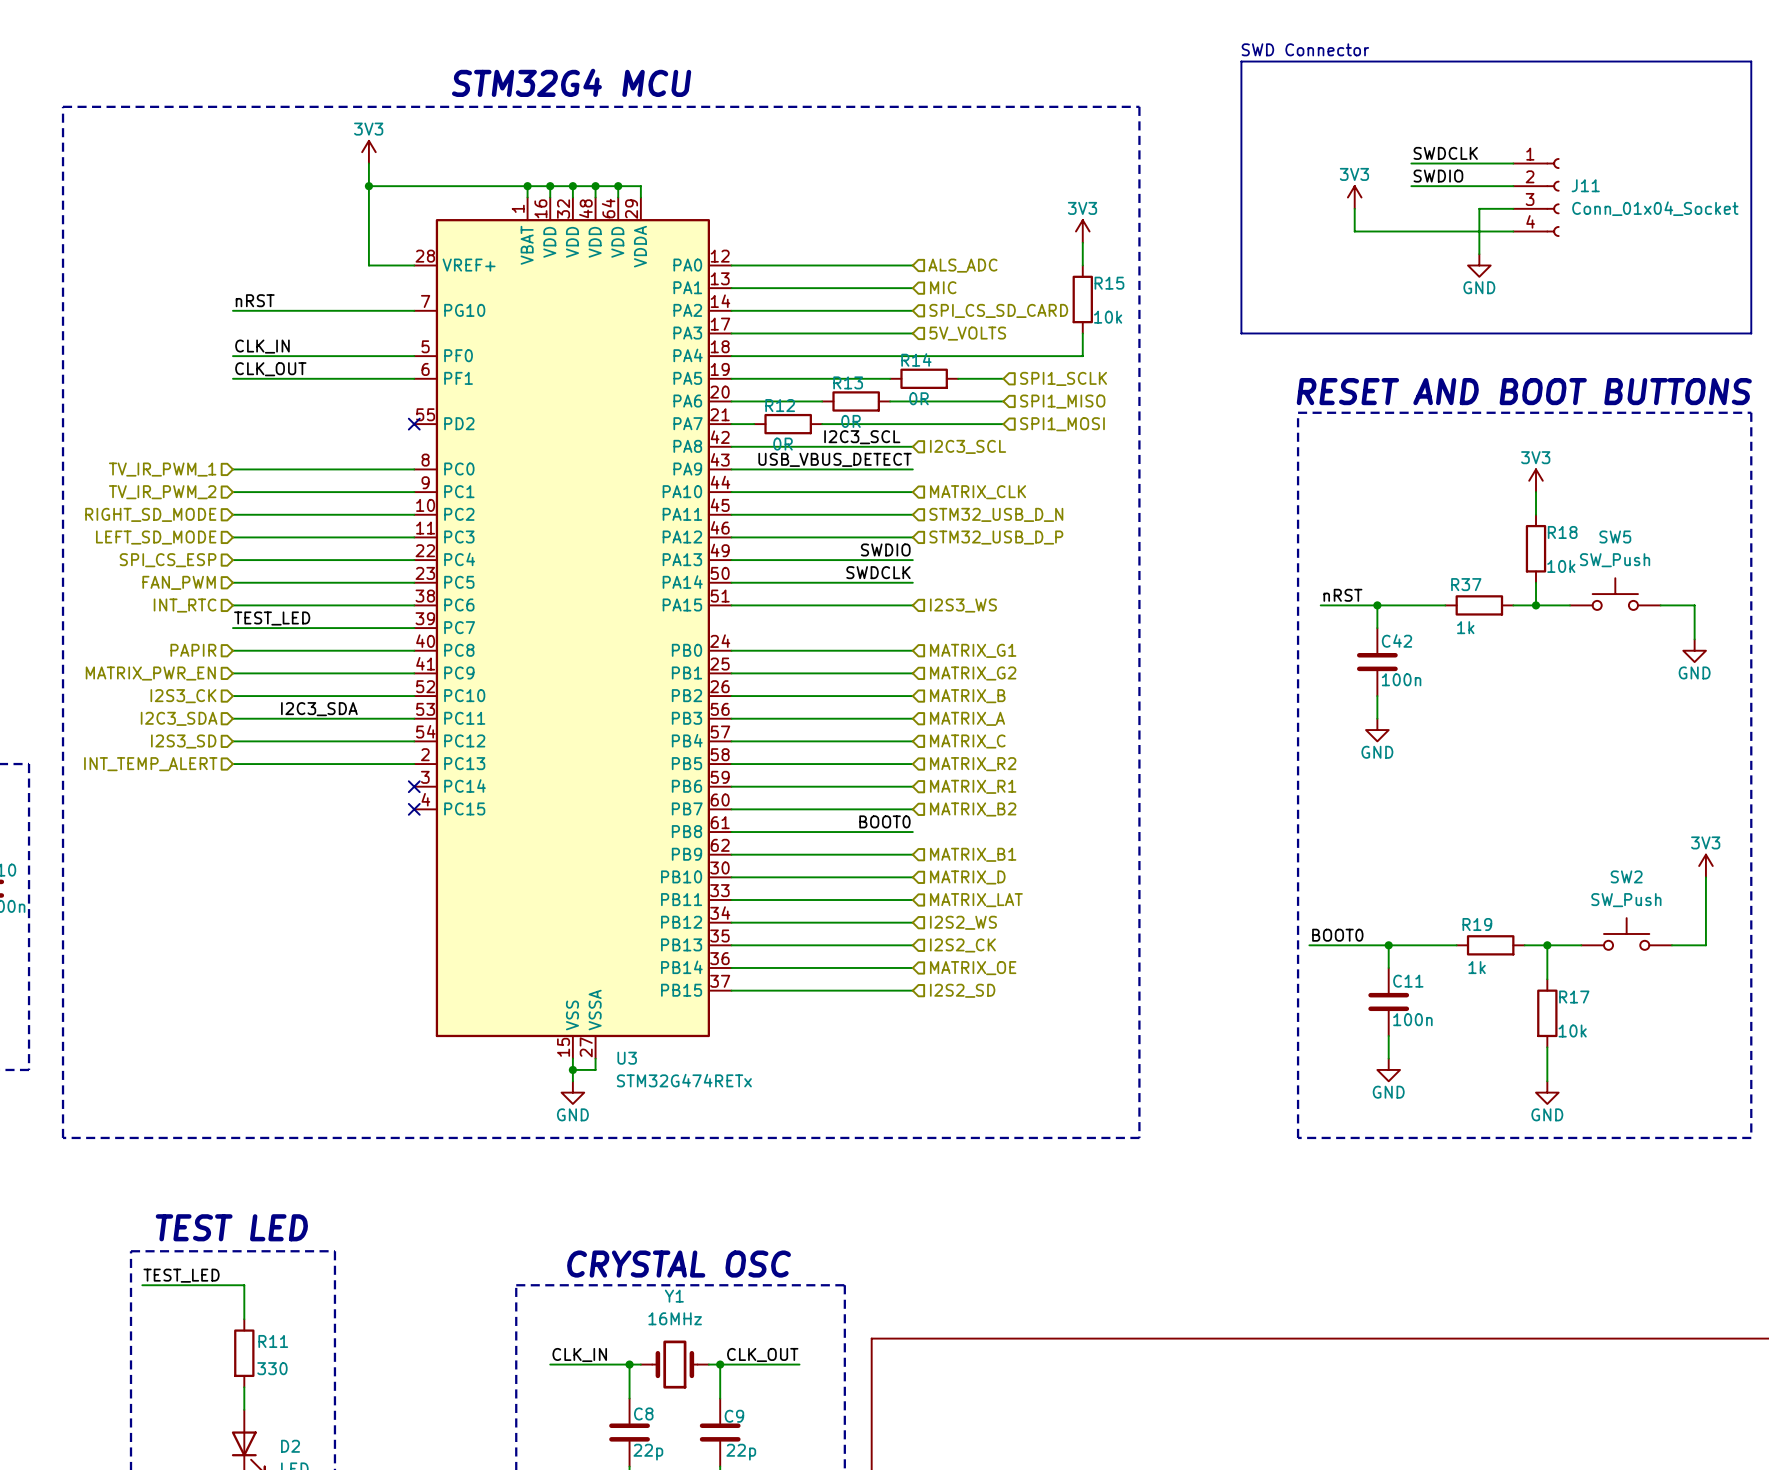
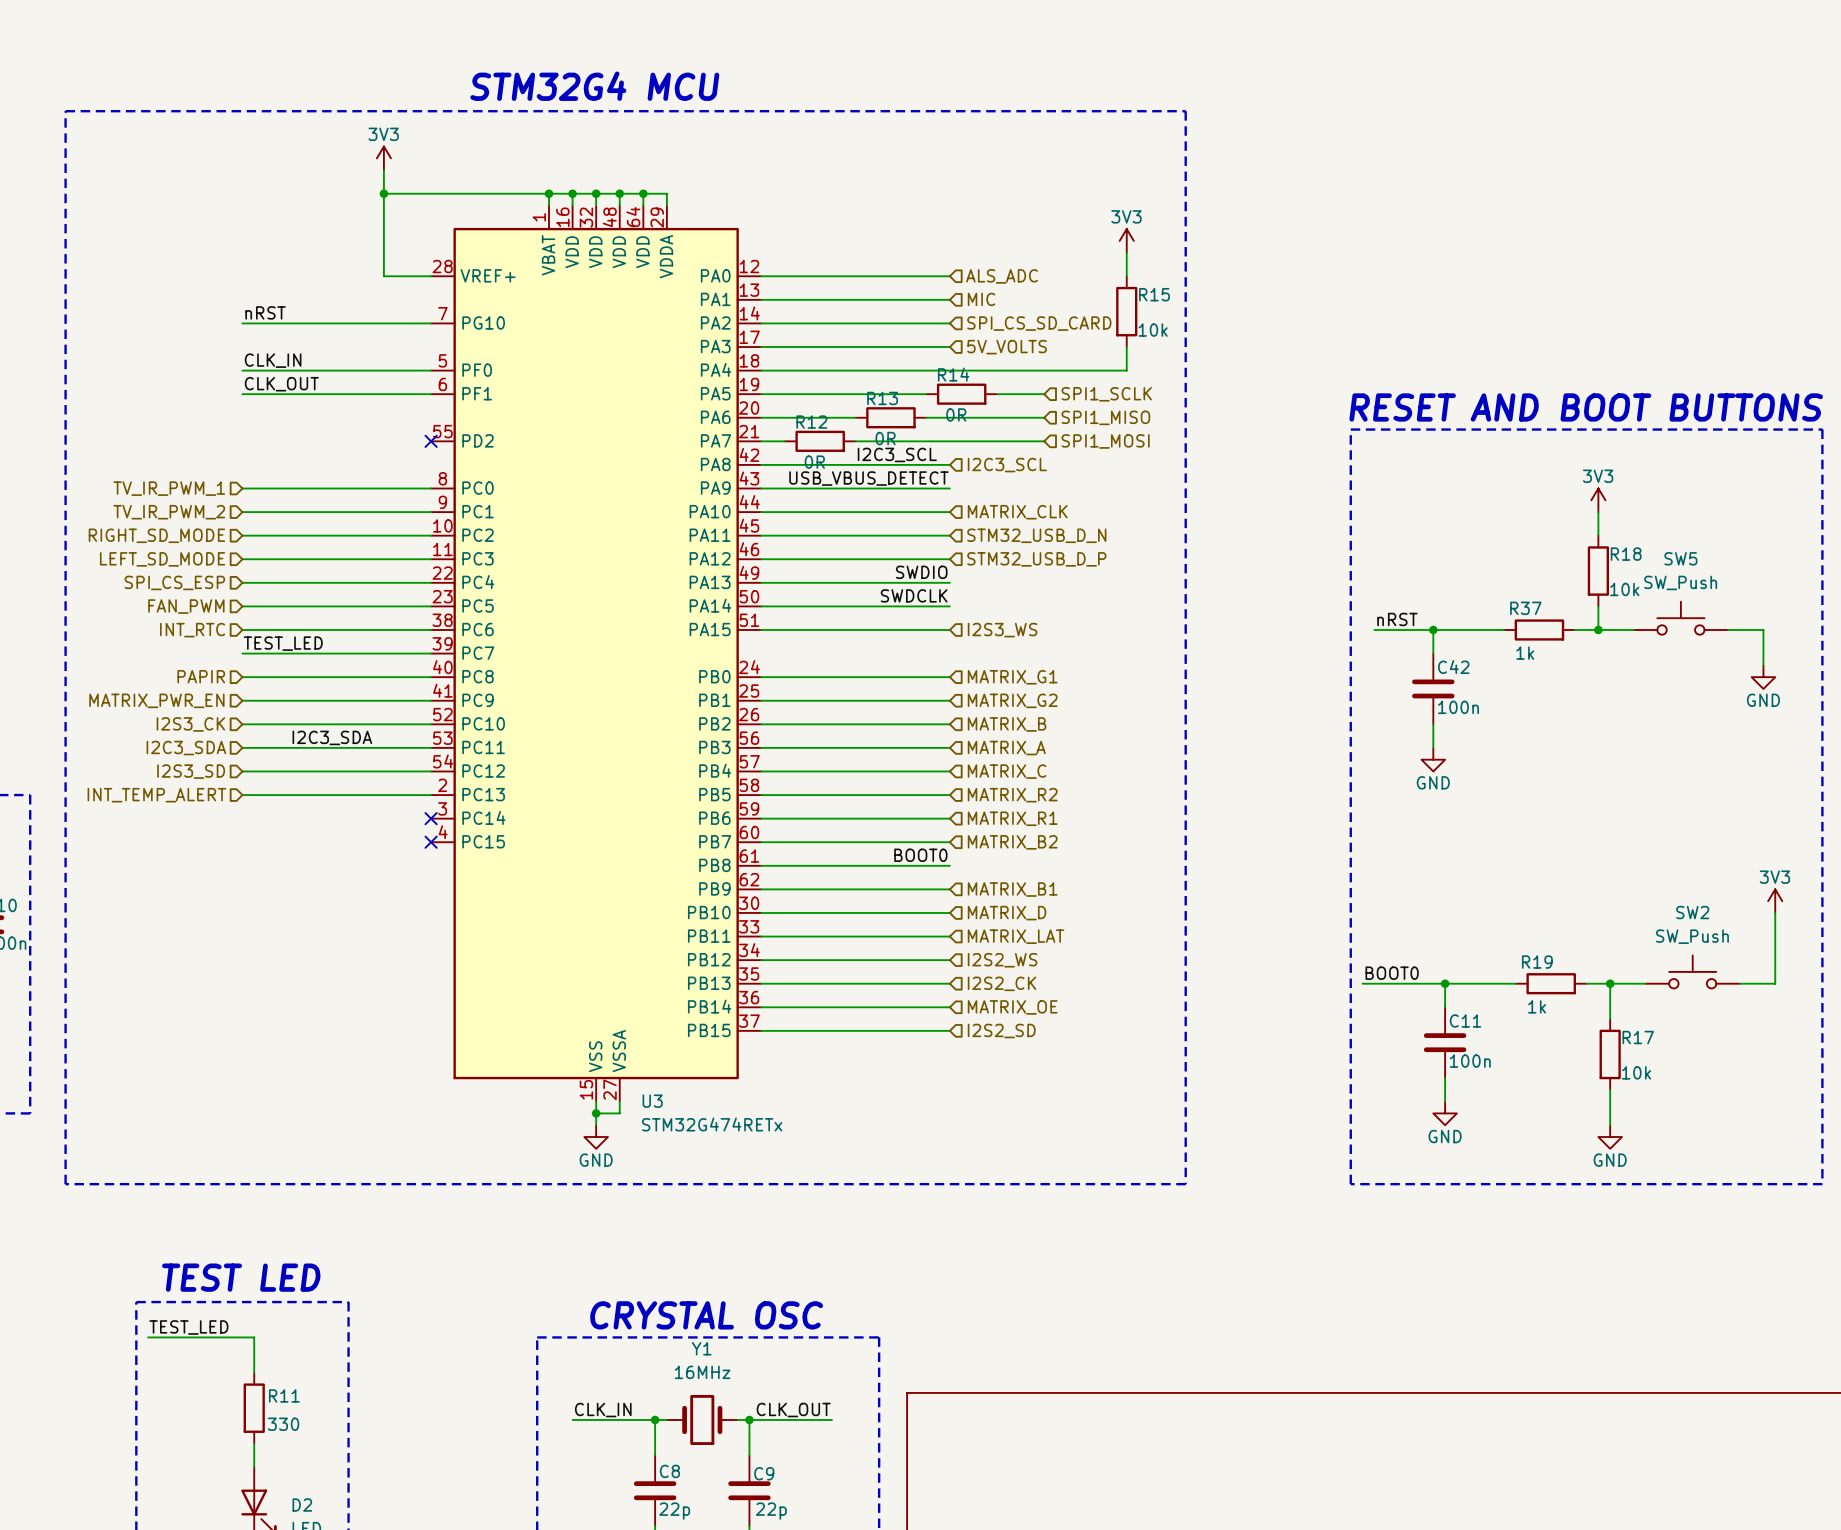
text: SWD Connector (1305, 49) -> none
line: (1241, 61) (1751, 61) (1751, 333) (1241, 333) (1241, 61) -> none
label: SWDCLK (1445, 153) -> none
wire: (1411, 163) (1513, 163) -> none
label: SWDIO (1438, 176) -> none
wire: (1411, 186) (1513, 186) -> none
power symbol: 3V3 (1354, 197) -> none
J11: Conn_01x04_Socket (1536, 197) -> none
wire: (1354, 208) (1354, 231) (1513, 231) -> none
wire: (1513, 208) (1479, 208) (1479, 254) -> none
power symbol: GND (1479, 265) -> none

